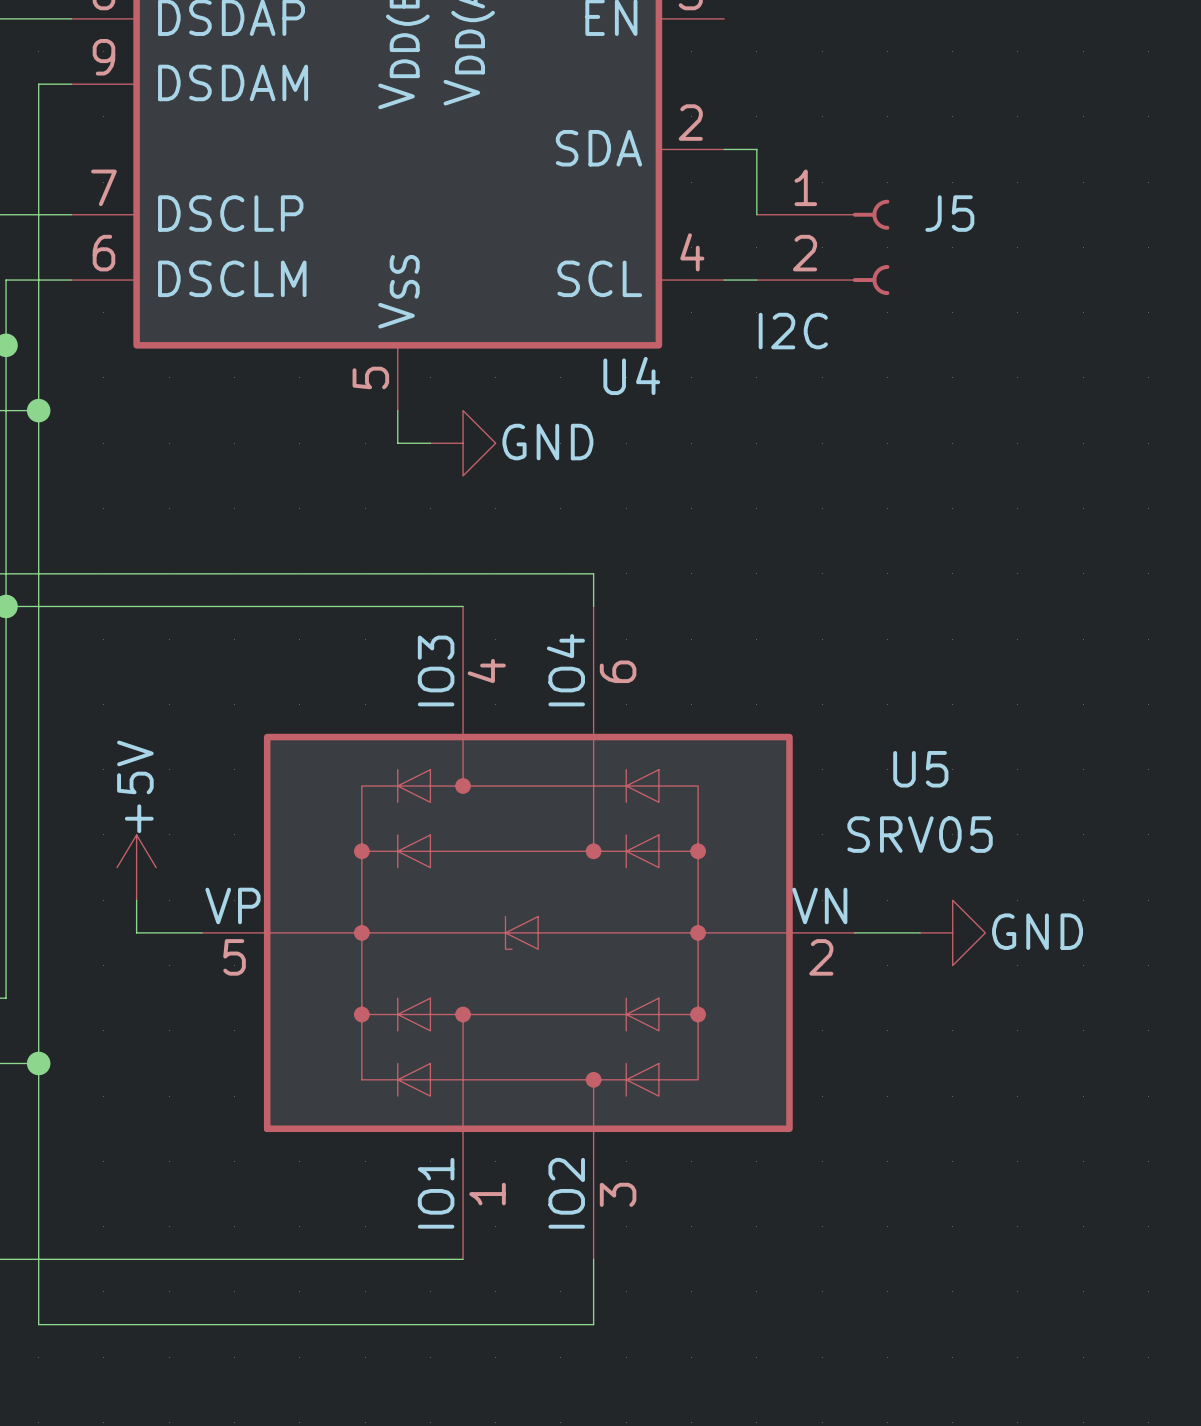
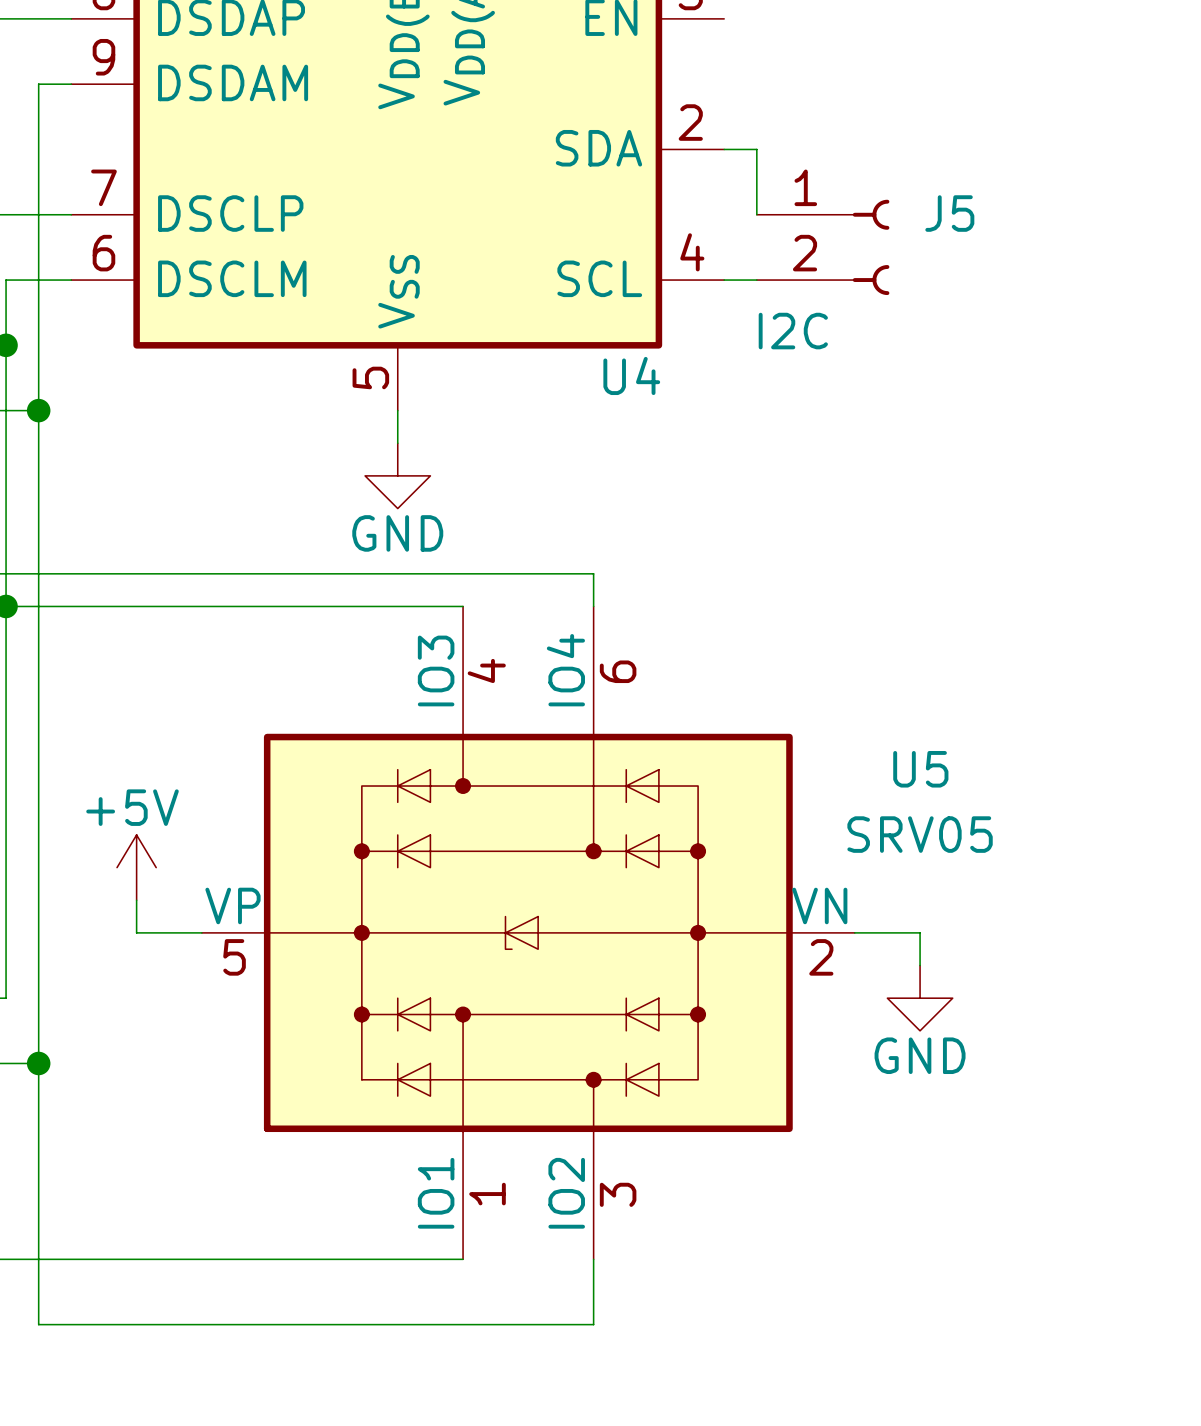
wire: (397, 443) (430, 443) -> none
power symbol rotation: 0° (463, 443) -> 90° clockwise (397, 475)
power symbol position: GND (463, 443) -> GND (397, 475)
power symbol text rotation: 0° (135, 786) -> 90° clockwise (132, 807)
wire: none -> (920, 932) (920, 965)
power symbol rotation: 0° (952, 932) -> 90° clockwise (920, 998)
power symbol position: GND (952, 932) -> GND (920, 998)

